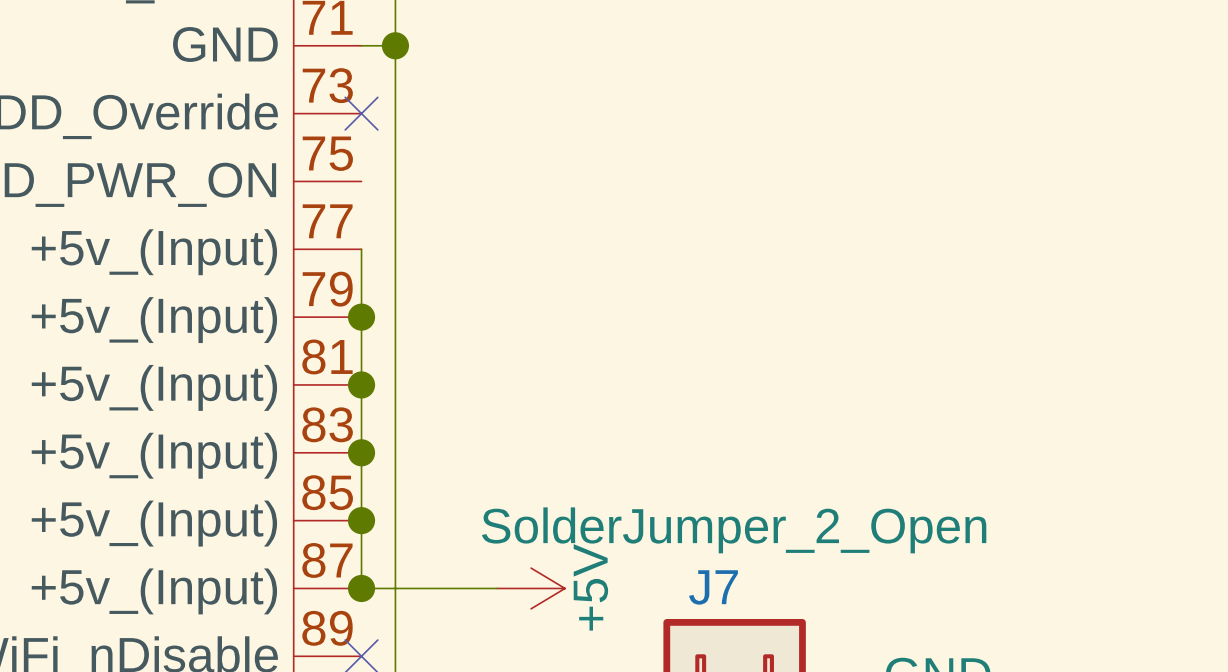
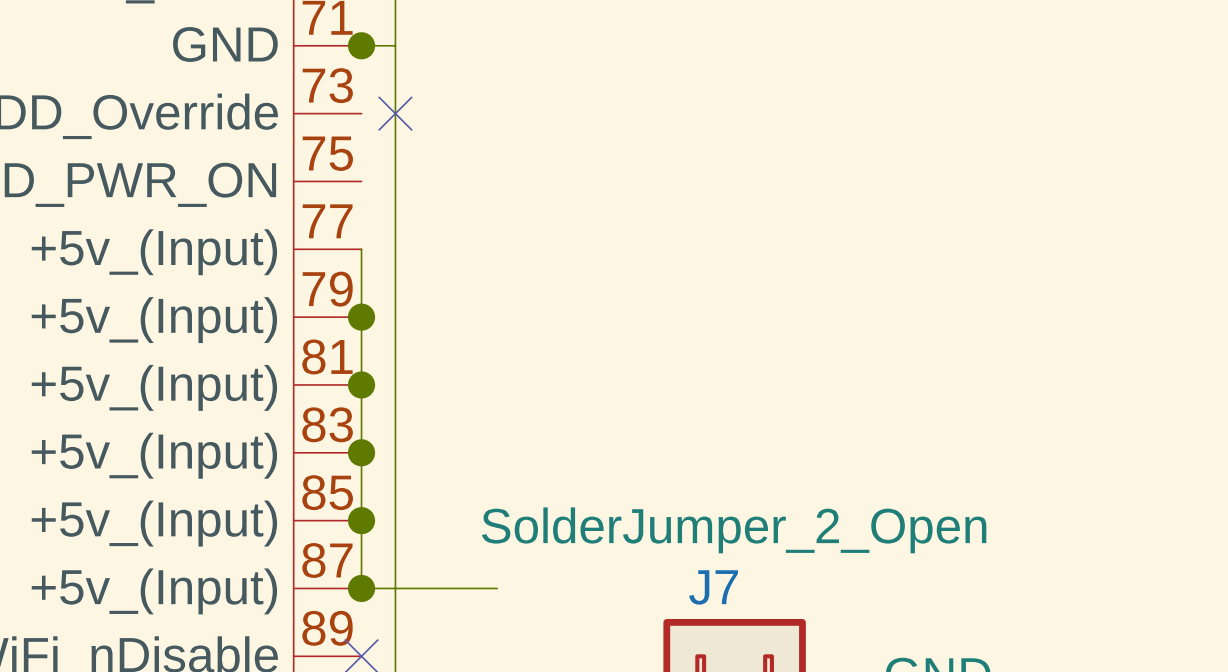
junction position: (395, 45) -> (361, 45)
no-connect mark position: (361, 113) -> (395, 113)
power symbol: +5V (531, 588) -> none

